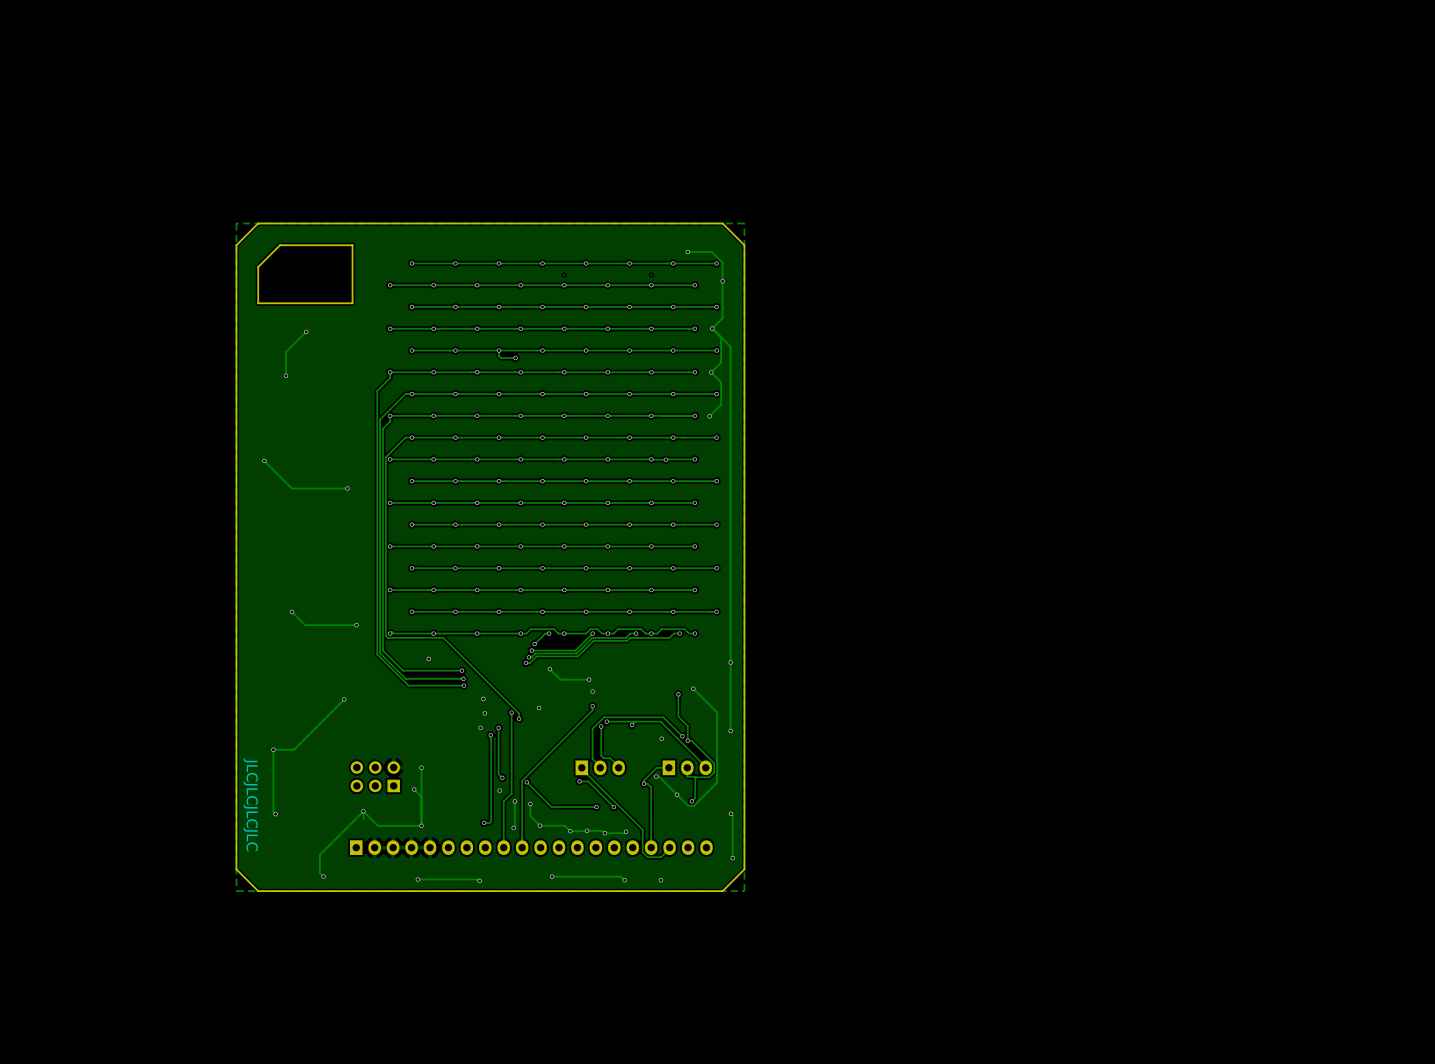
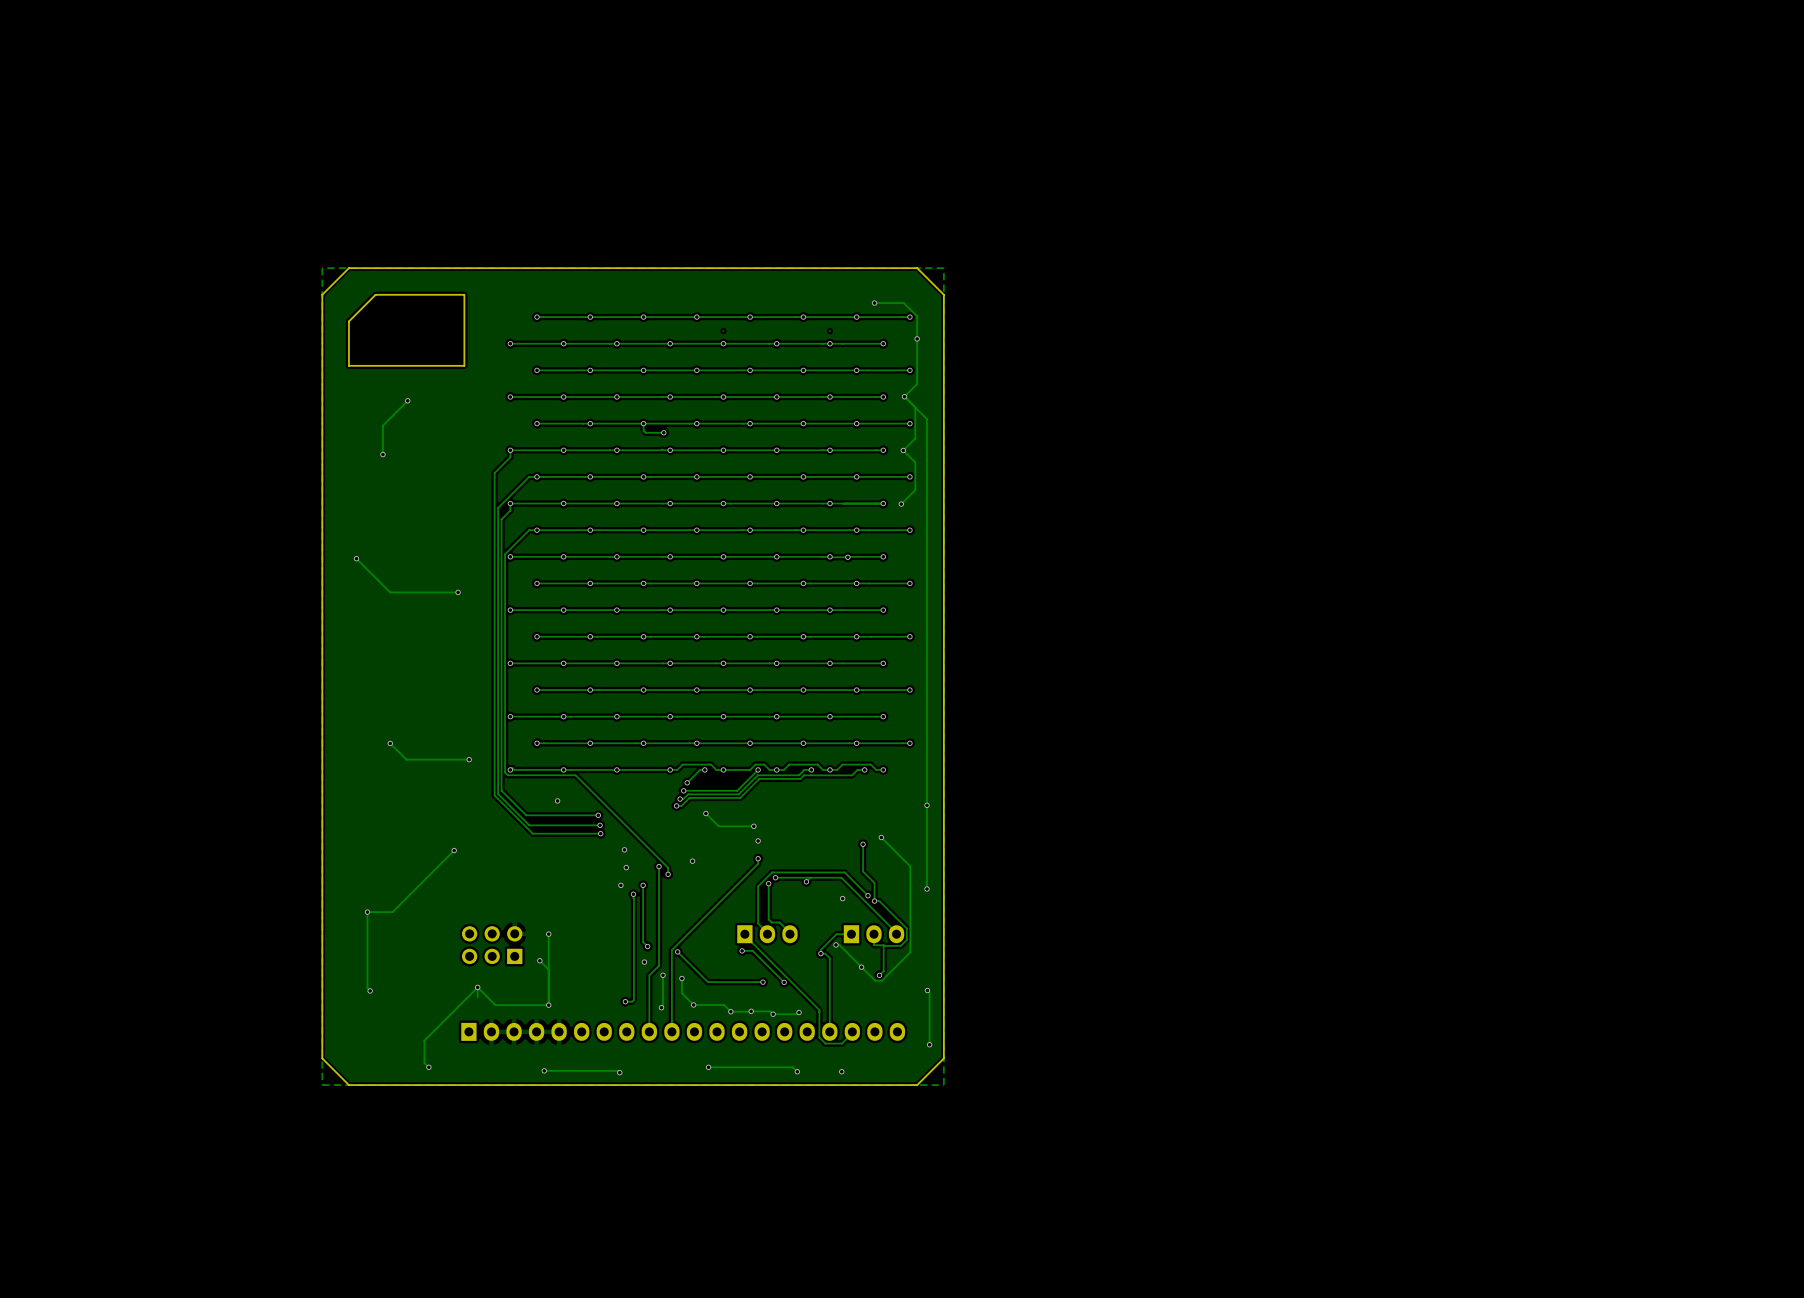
text: JLCJLCJLCJLC (250, 804) -> none

